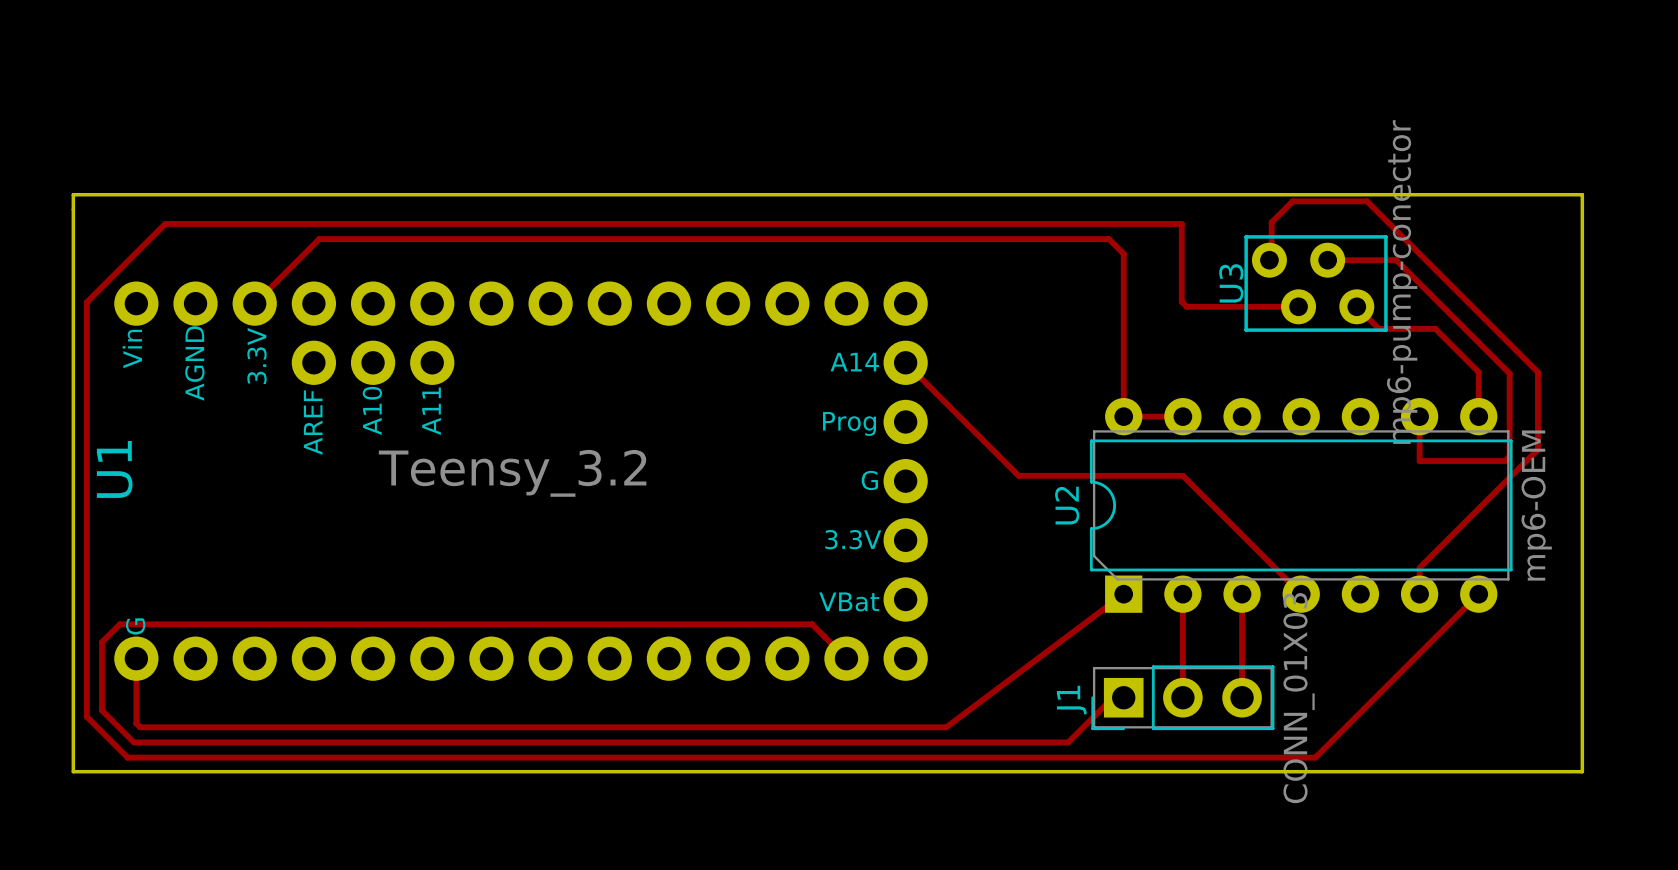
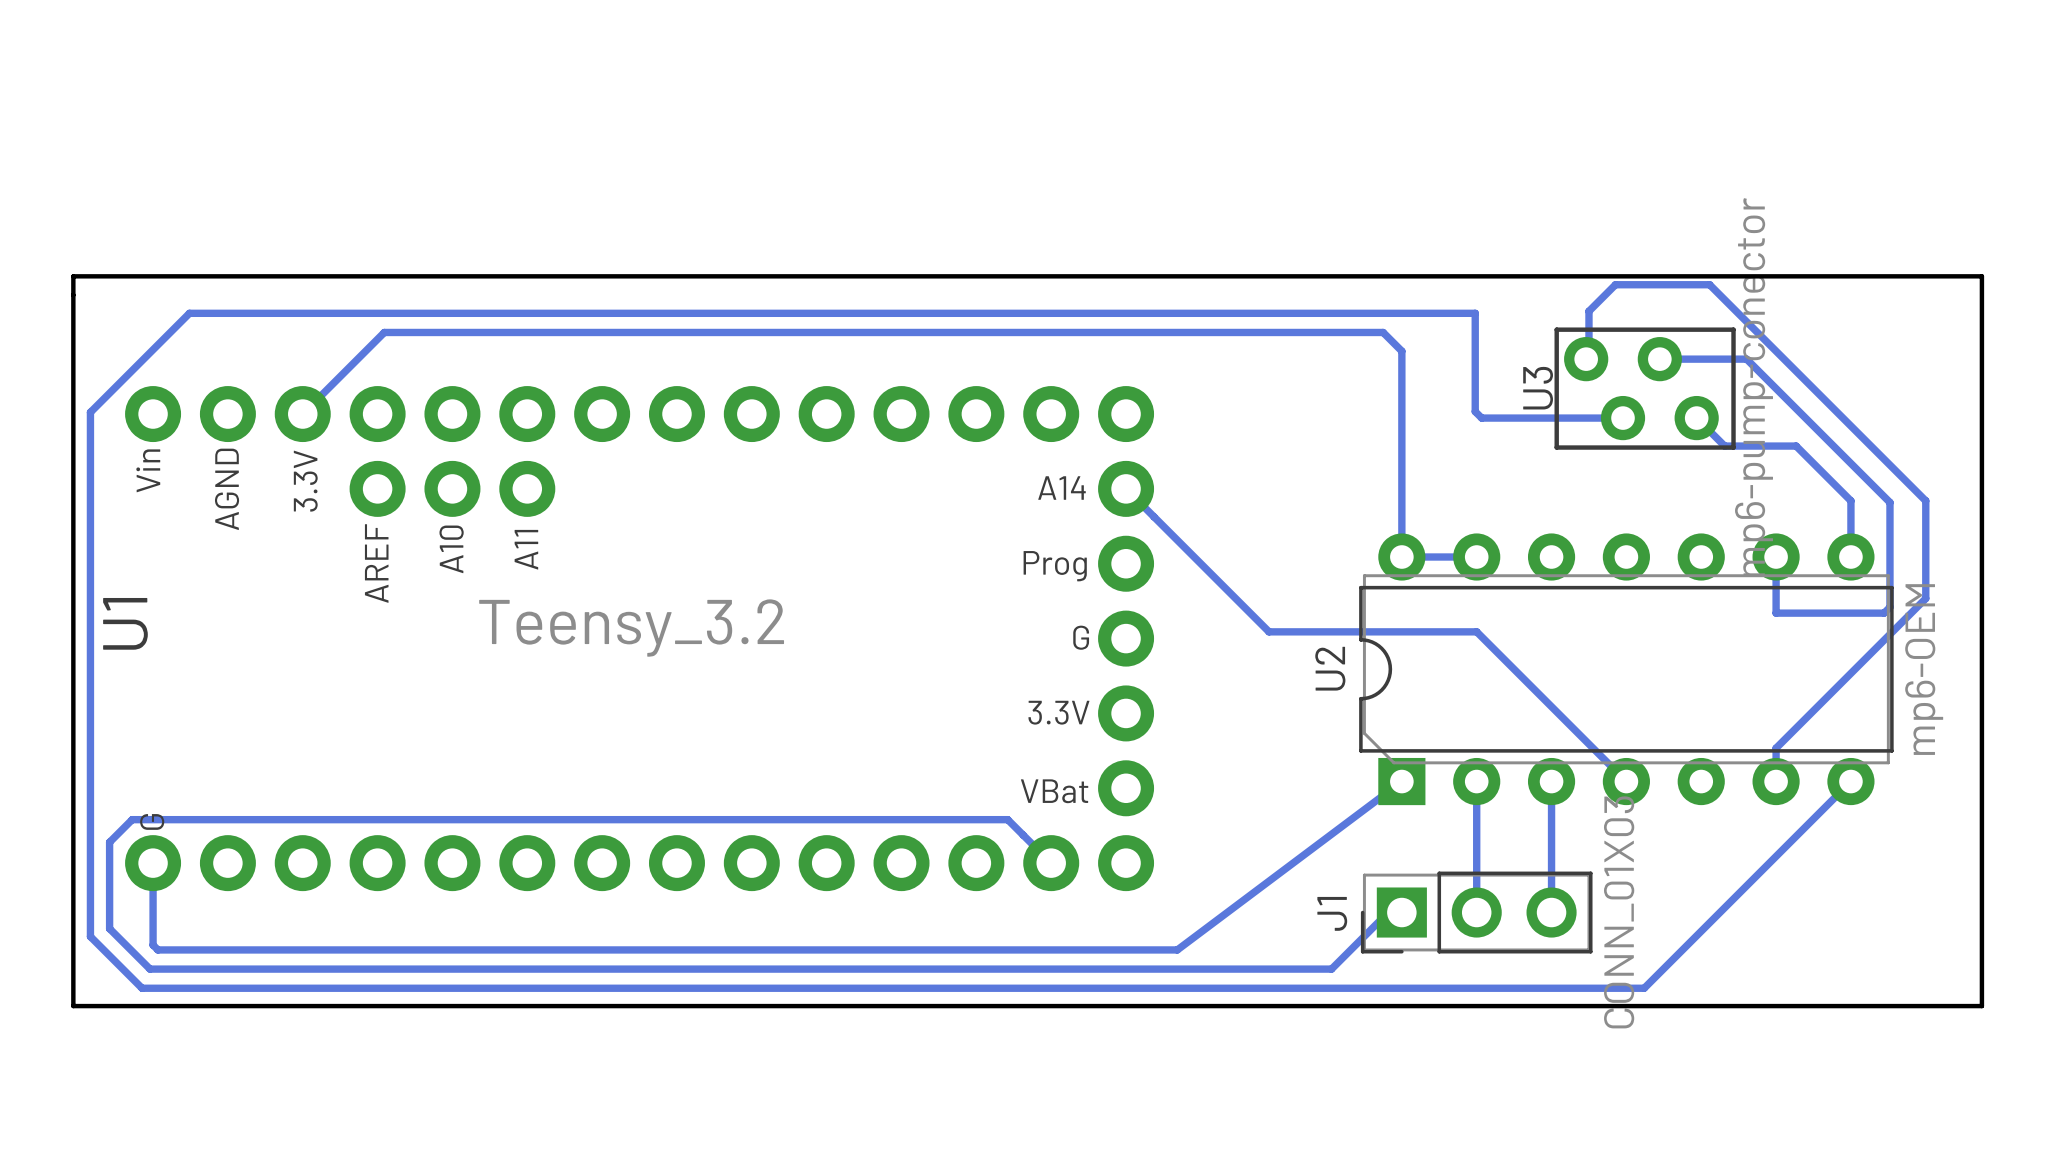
top track: (1269, 260) (1271, 257) (1271, 222) (1292, 201) (1367, 201) (1537, 372) (1537, 449) (1419, 567) (1419, 594) -> none
bottom track: none -> (1586, 359) (1588, 356) (1588, 311) (1615, 284) (1709, 284) (1925, 500) (1925, 598) (1776, 748) (1776, 781)
top track: (1327, 260) (1396, 260) (1509, 373) (1509, 456) (1504, 461) (1419, 461) (1419, 416) -> none
bottom track: none -> (1659, 359) (1746, 359) (1889, 502) (1889, 607) (1884, 613) (1776, 613) (1776, 557)
top track: (254, 303) (319, 239) (1108, 239) (1123, 253) (1123, 416) (1182, 416) -> none
bottom track: none -> (302, 414) (384, 332) (1383, 332) (1401, 351) (1401, 557) (1476, 557)
top track: (1298, 306) (1186, 306) (1181, 301) (1181, 223) (165, 223) (86, 302) (86, 716) (127, 757) (1315, 757) (1478, 594) -> none
bottom track: none -> (1623, 418) (1481, 418) (1475, 411) (1475, 313) (189, 313) (90, 412) (90, 936) (142, 988) (1644, 988) (1850, 781)
top track: (1356, 306) (1378, 328) (1435, 328) (1478, 372) (1478, 416) -> none
bottom track: none -> (1696, 418) (1724, 446) (1796, 446) (1850, 500) (1850, 557)
top track: (905, 362) (1018, 475) (1182, 475) (1301, 594) -> none
bottom track: none -> (1126, 488) (1269, 631) (1476, 631) (1626, 781)
top track: (1123, 594) (946, 727) (140, 727) (136, 723) (136, 658) -> none
bottom track: none -> (1401, 781) (1177, 949) (157, 949) (153, 945) (153, 863)
top track: (1182, 594) (1182, 682) (1197, 697) -> none
bottom track: none -> (1476, 781) (1476, 893) (1495, 912)
top track: (1242, 594) (1242, 682) (1256, 697) -> none
bottom track: none -> (1551, 781) (1551, 893) (1570, 912)
top track: (846, 658) (812, 624) (119, 624) (102, 642) (102, 710) (133, 742) (1068, 742) (1112, 697) (1138, 697) -> none
bottom track: none -> (1051, 863) (1007, 819) (132, 819) (109, 842) (109, 928) (149, 969) (1331, 969) (1388, 912) (1420, 912)

